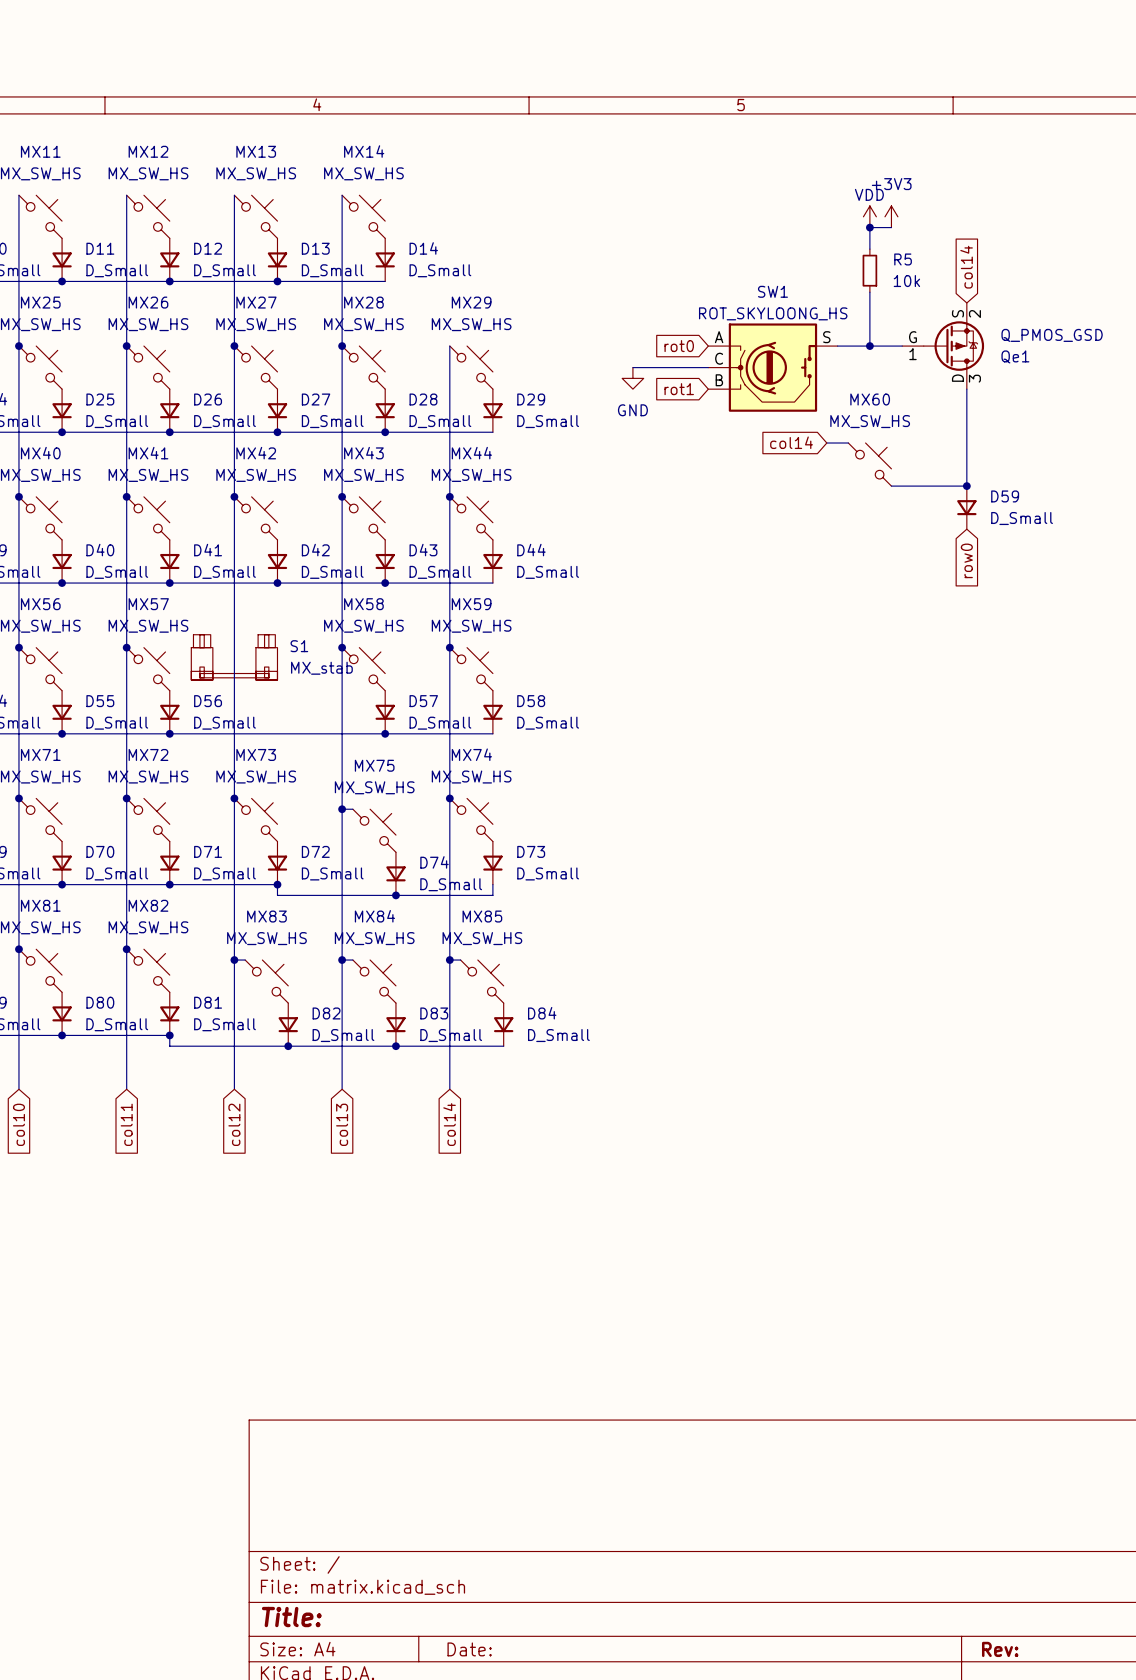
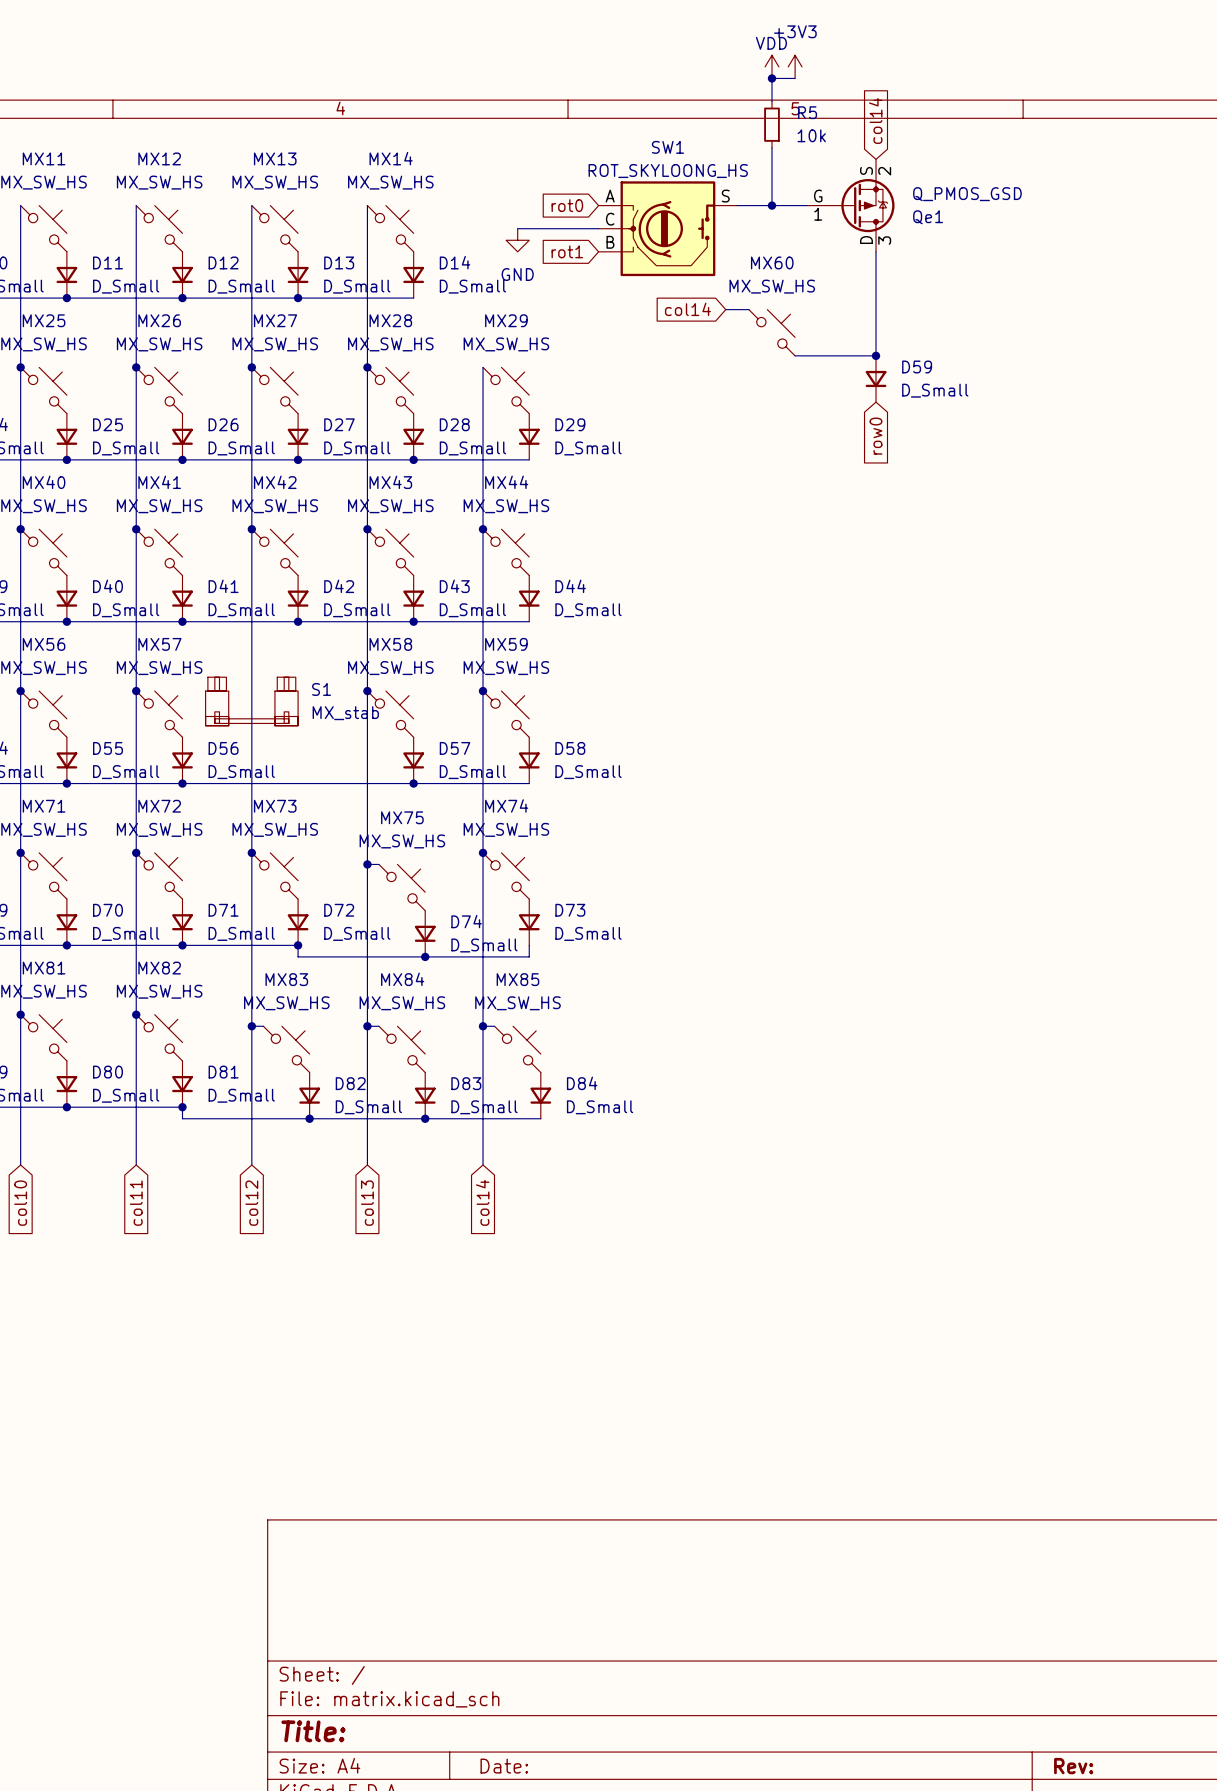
power symbol: none -> VDD (771, 66)
power symbol: none -> +3V3 (795, 66)
junction: none -> (771, 78)
wire: none -> (795, 78) (771, 78) (771, 101)
global label: none -> col14 (875, 120)
wire: none -> (771, 147) (771, 205)
global label: none -> rot0 (567, 205)
wire: none -> (737, 205) (806, 205)
junction: none -> (771, 205)
wire: none -> (517, 228) (598, 228)
power symbol: VDD (869, 216) -> none
power symbol: +3V3 (891, 216) -> none
power symbol: none -> GND (517, 240)
junction: (869, 227) -> none
wire: (891, 227) (869, 227) (869, 249) -> none
global label: none -> rot1 (567, 251)
wire: none -> (876, 251) (876, 355) (795, 355)
global label: col14 (966, 267) -> none
R5 position: (869, 270) -> (771, 124)
global label: none -> col14 (687, 309)
wire: none -> (725, 309) (748, 309)
wire: (869, 292) (869, 346) -> none
junction: none -> (876, 355)
global label: rot0 (679, 346) -> none
wire: (837, 346) (902, 346) -> none
junction: (869, 346) -> none
Qe1 position: (943, 346) -> (850, 205)
wire: (632, 367) (708, 367) -> none
SW1 position: (772, 367) -> (667, 228)
power symbol: GND (632, 378) -> none
global label: rot1 (679, 389) -> none
wire: (966, 389) (966, 486) (891, 486) -> none
global label: none -> row0 (876, 436)
global label: col14 (791, 442) -> none
wire: (826, 443) (848, 443) -> none
MX60 position: (869, 464) -> (771, 332)
junction: (966, 486) -> none
D59 position: (966, 507) -> (876, 378)
global label: row0 (966, 560) -> none

